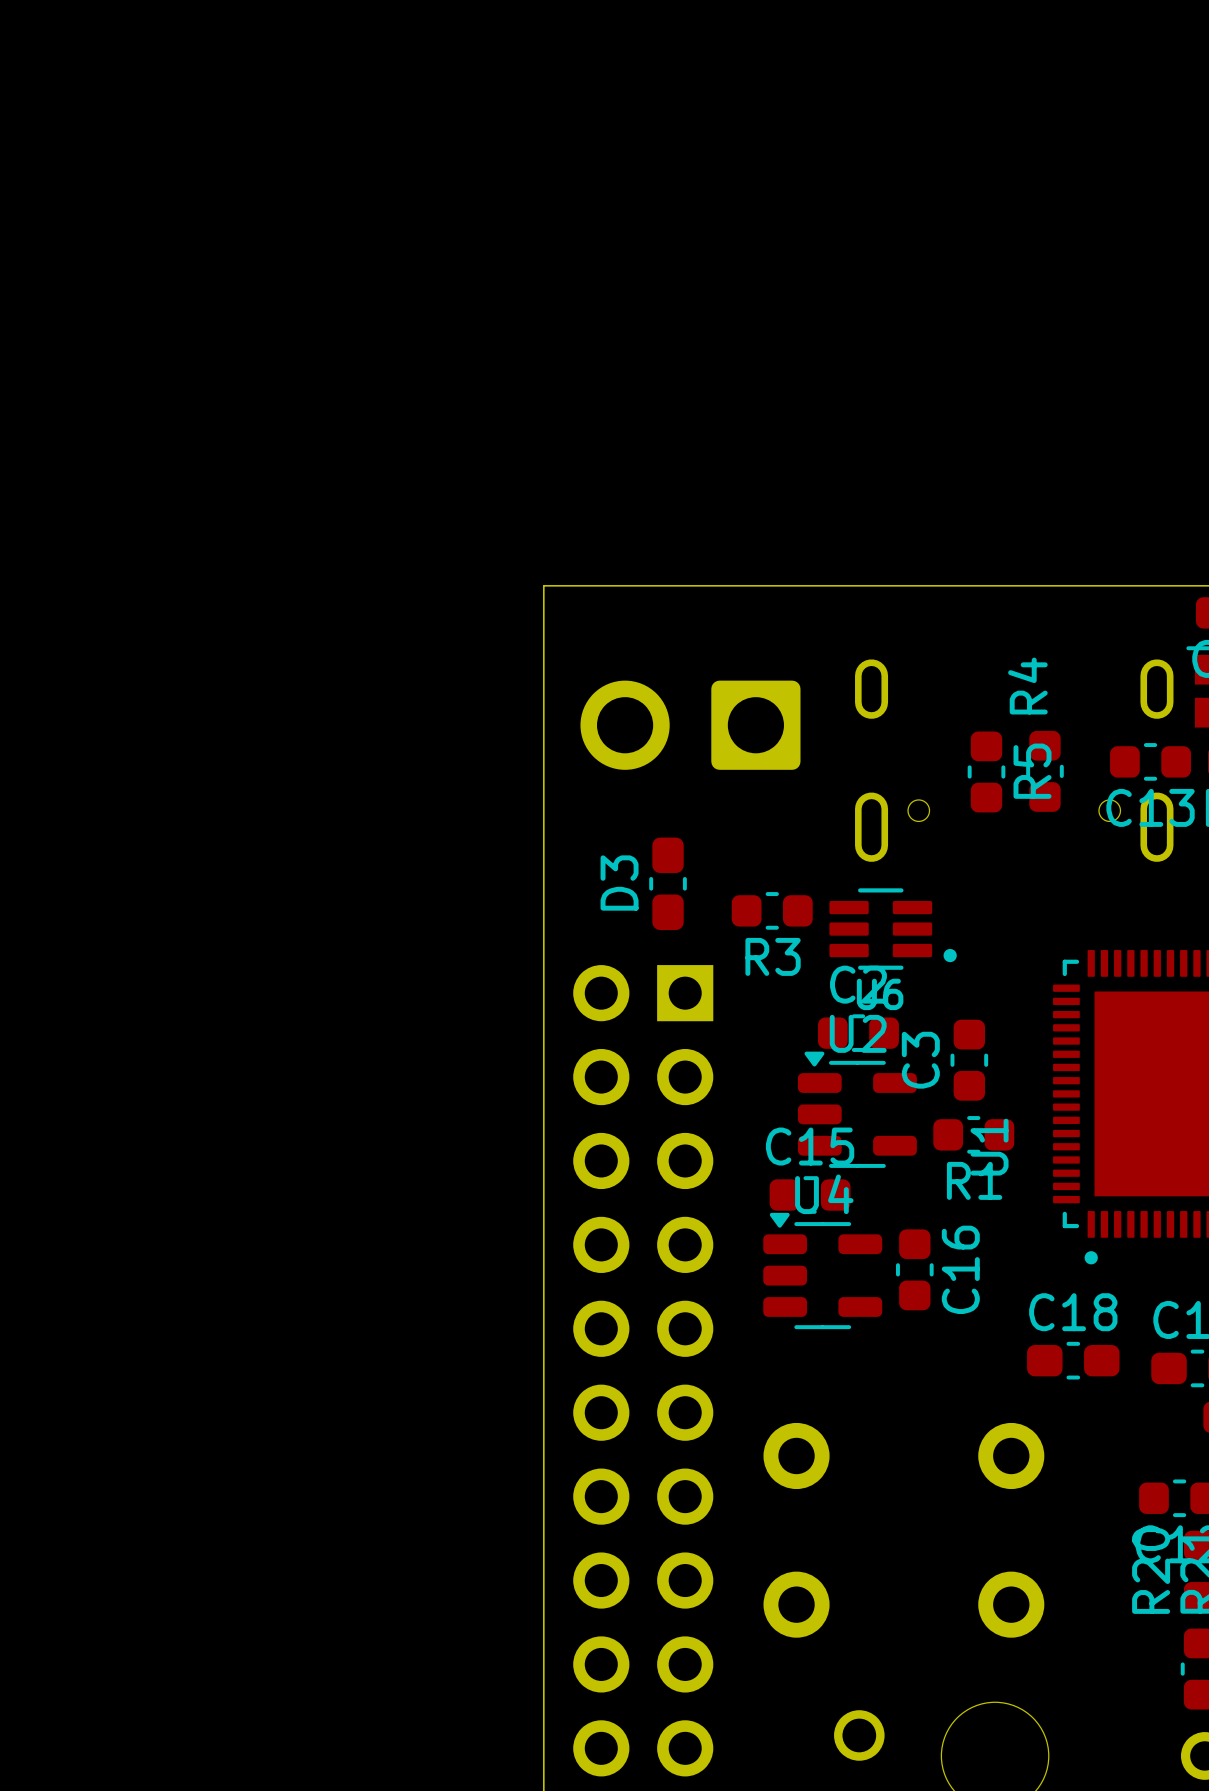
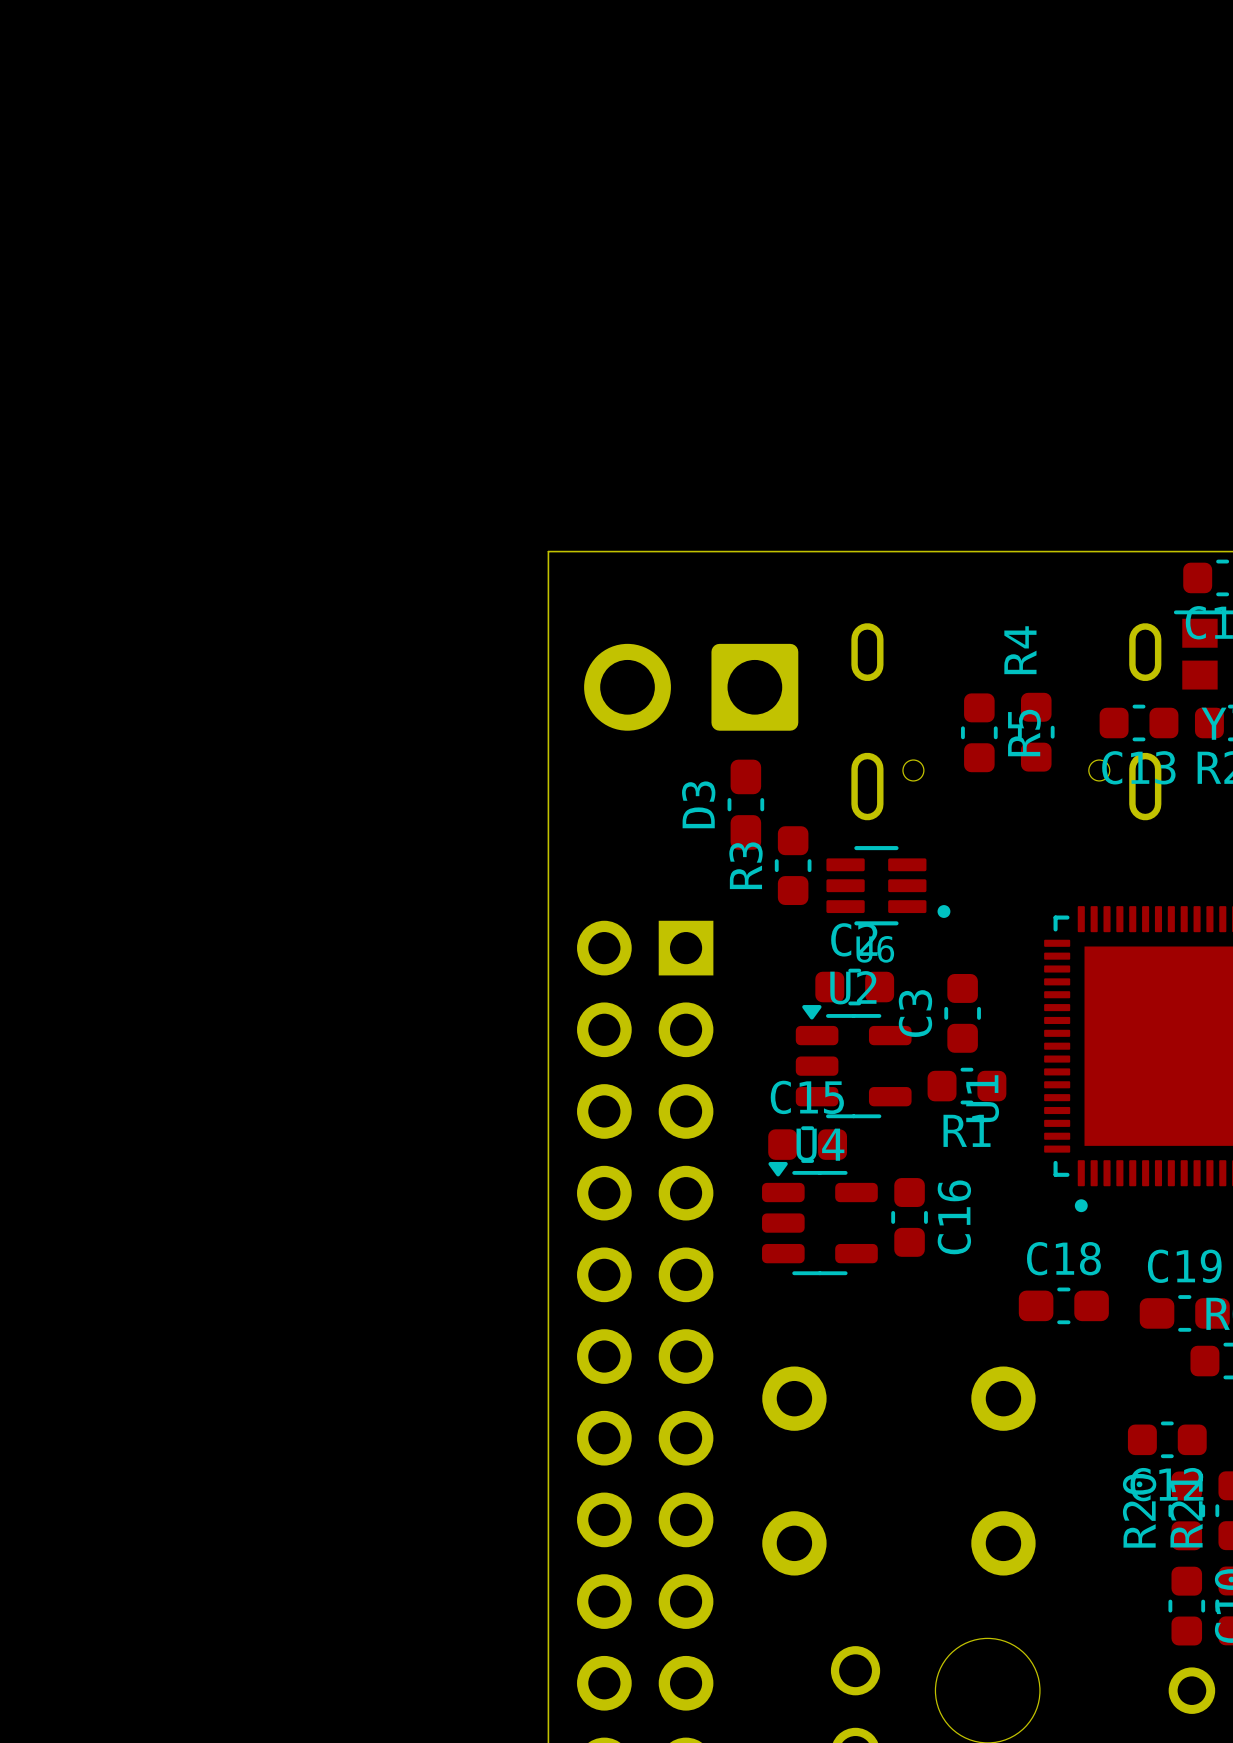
D3 position: (668, 883) -> (745, 804)
R3 rotation: 0° (772, 910) -> 90° clockwise (793, 865)

